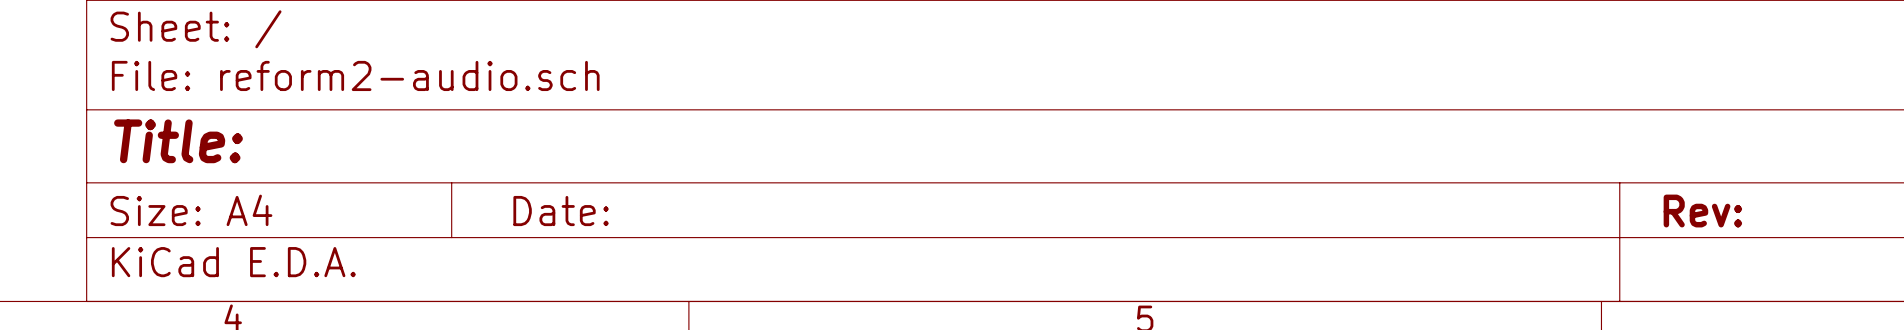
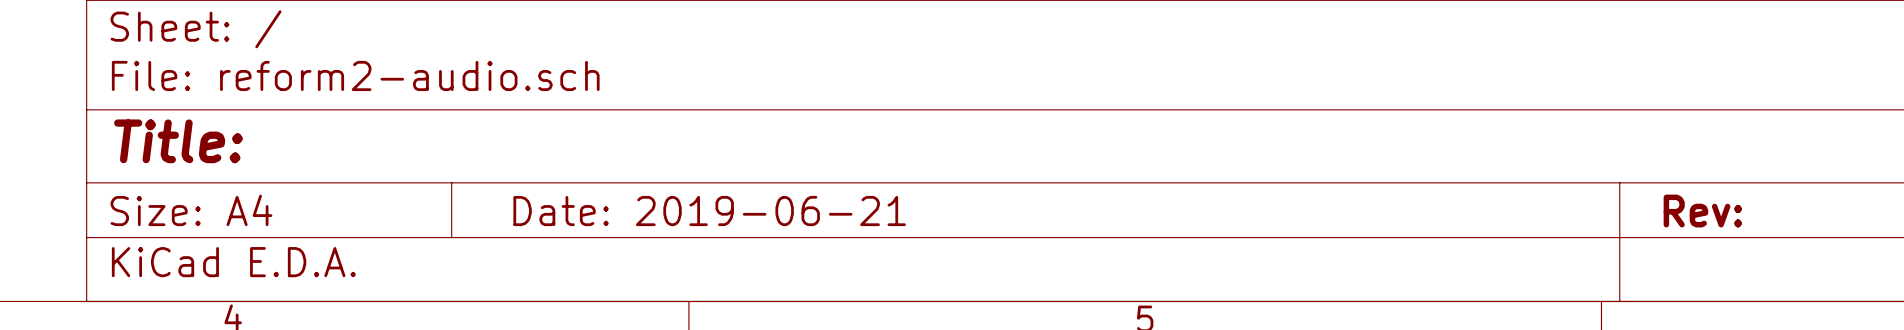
title block: Date: (561, 211) -> Date: 2019-06-21 (709, 211)

